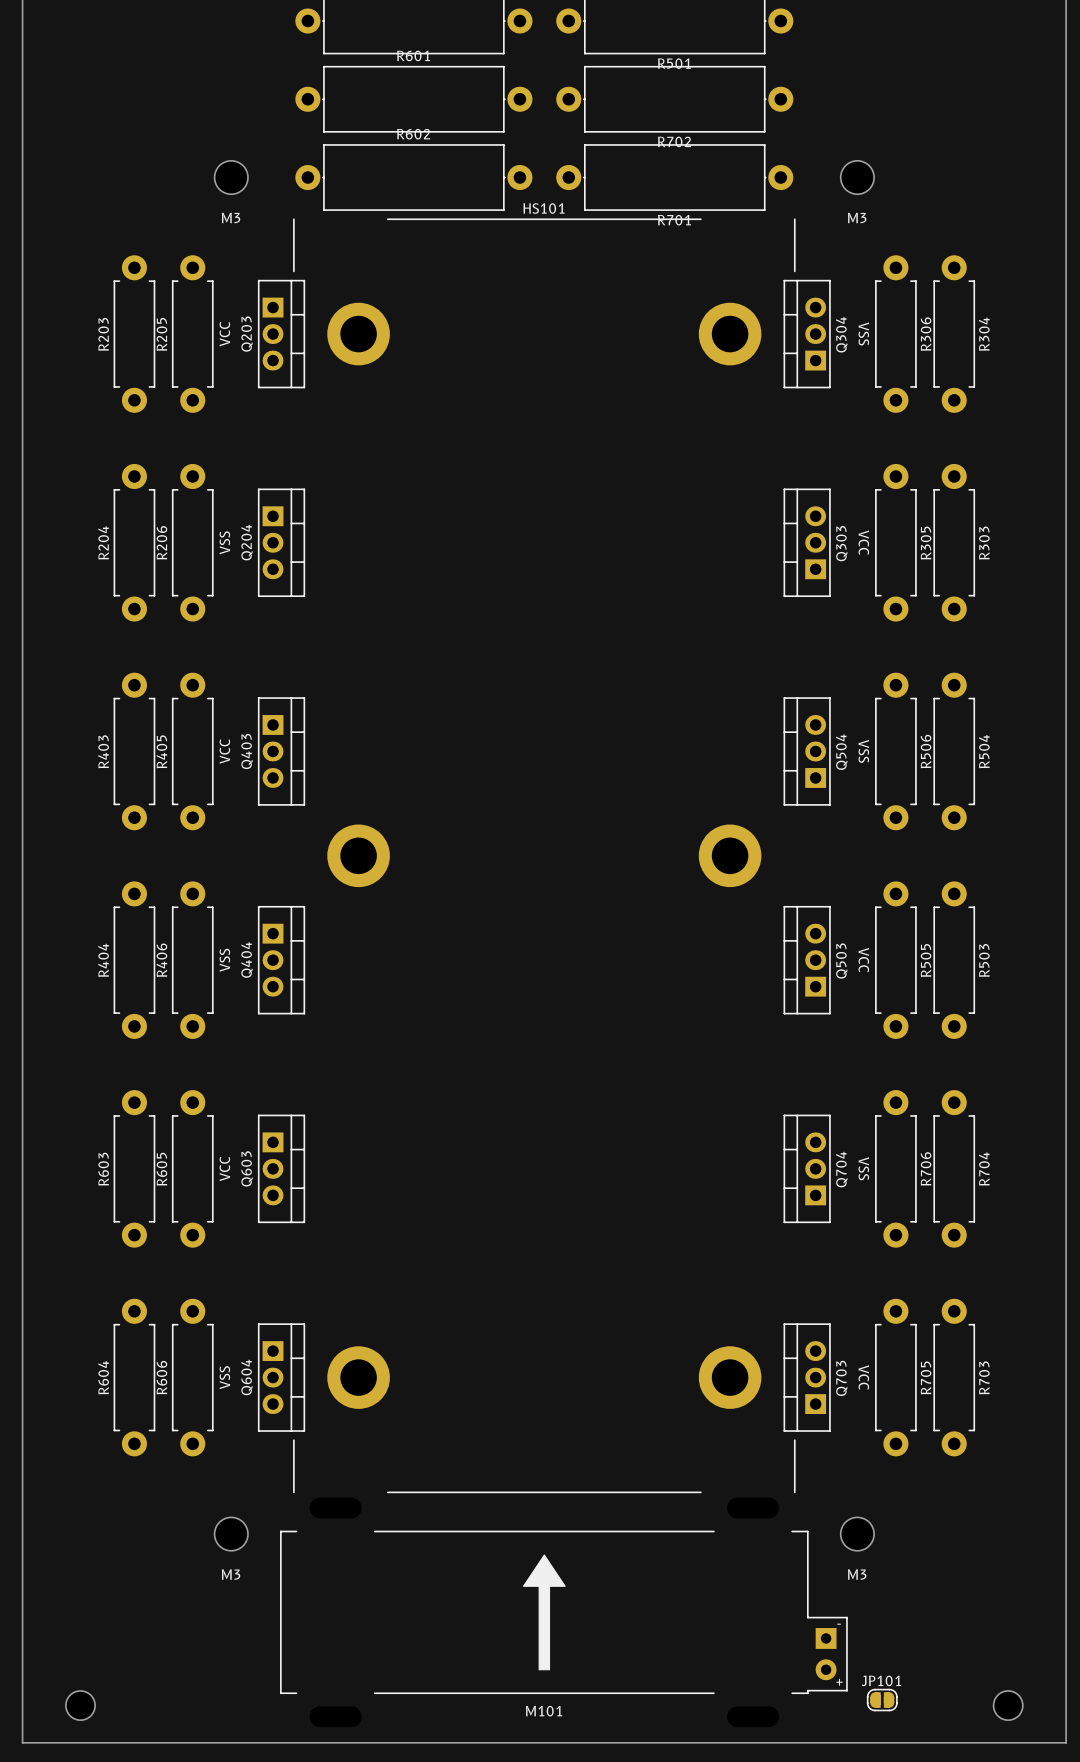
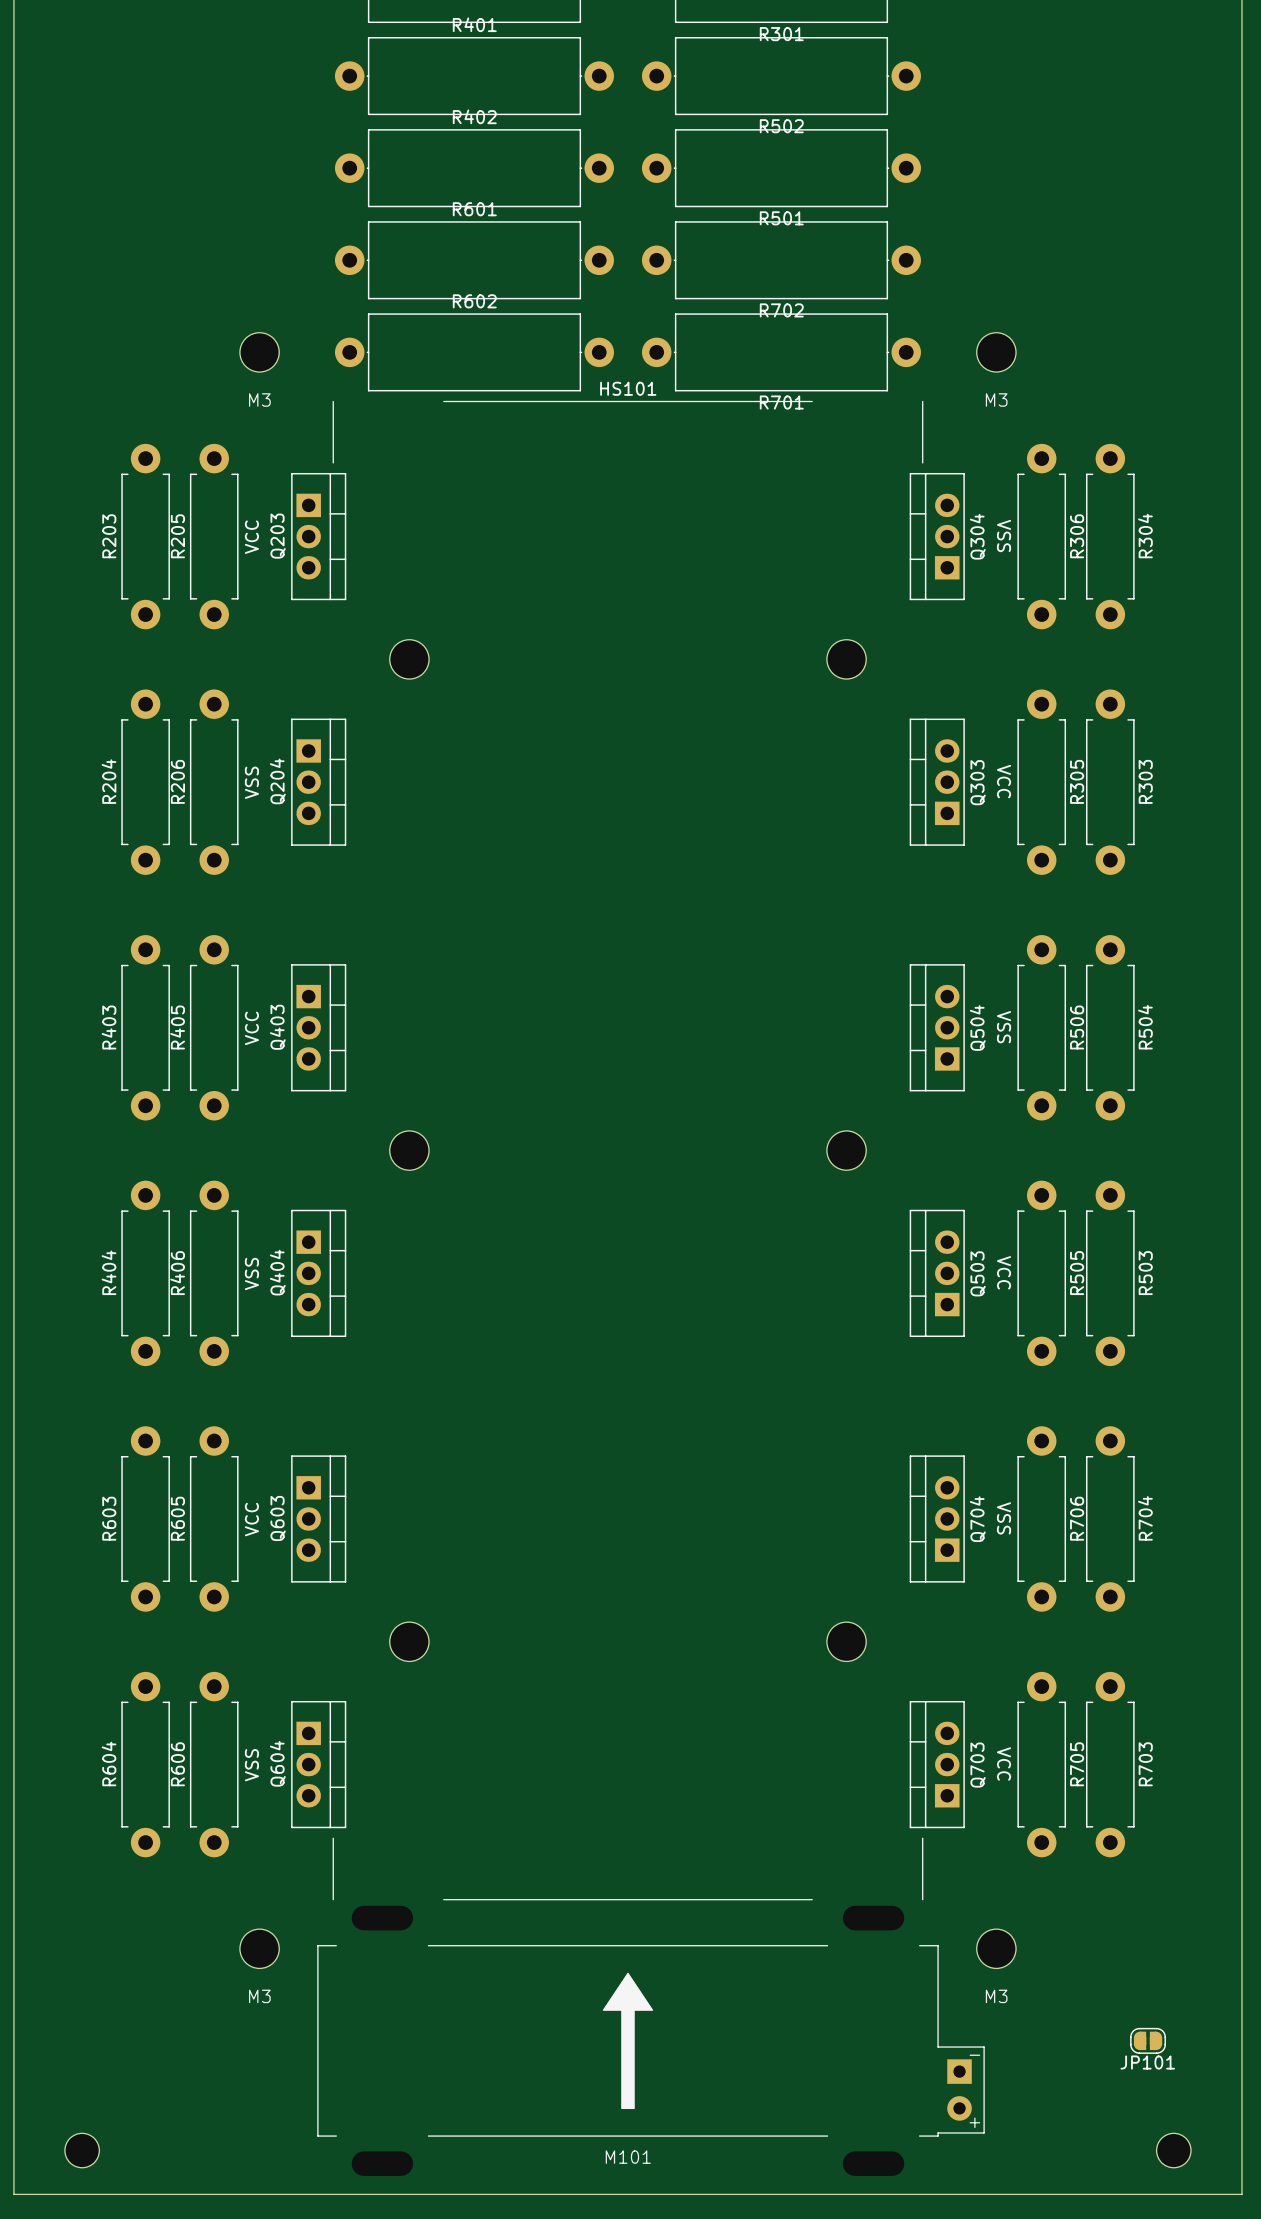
HS101 footprint: [293, 218, 796, 1493] -> [332, 400, 924, 1901]
JP101 name position: JP101 (881, 1680) -> JP101 (1147, 2062)
JP101 position: (882, 1700) -> (1148, 2040)

